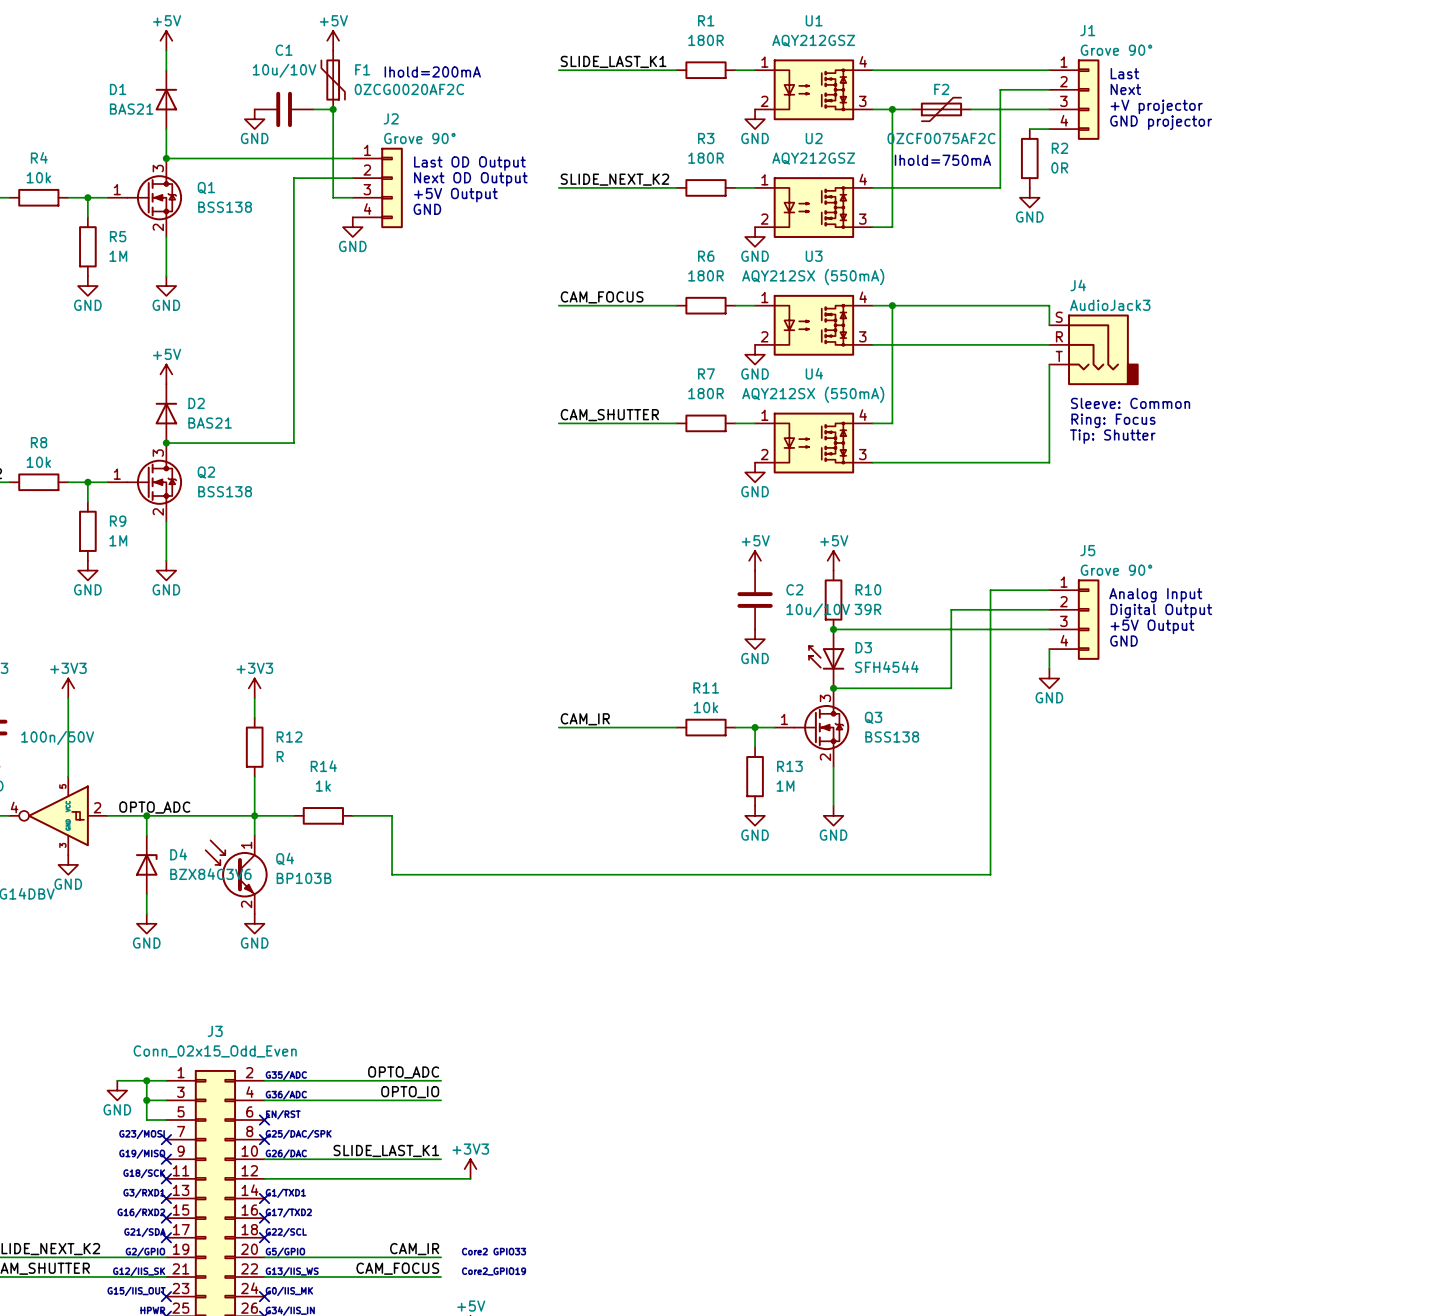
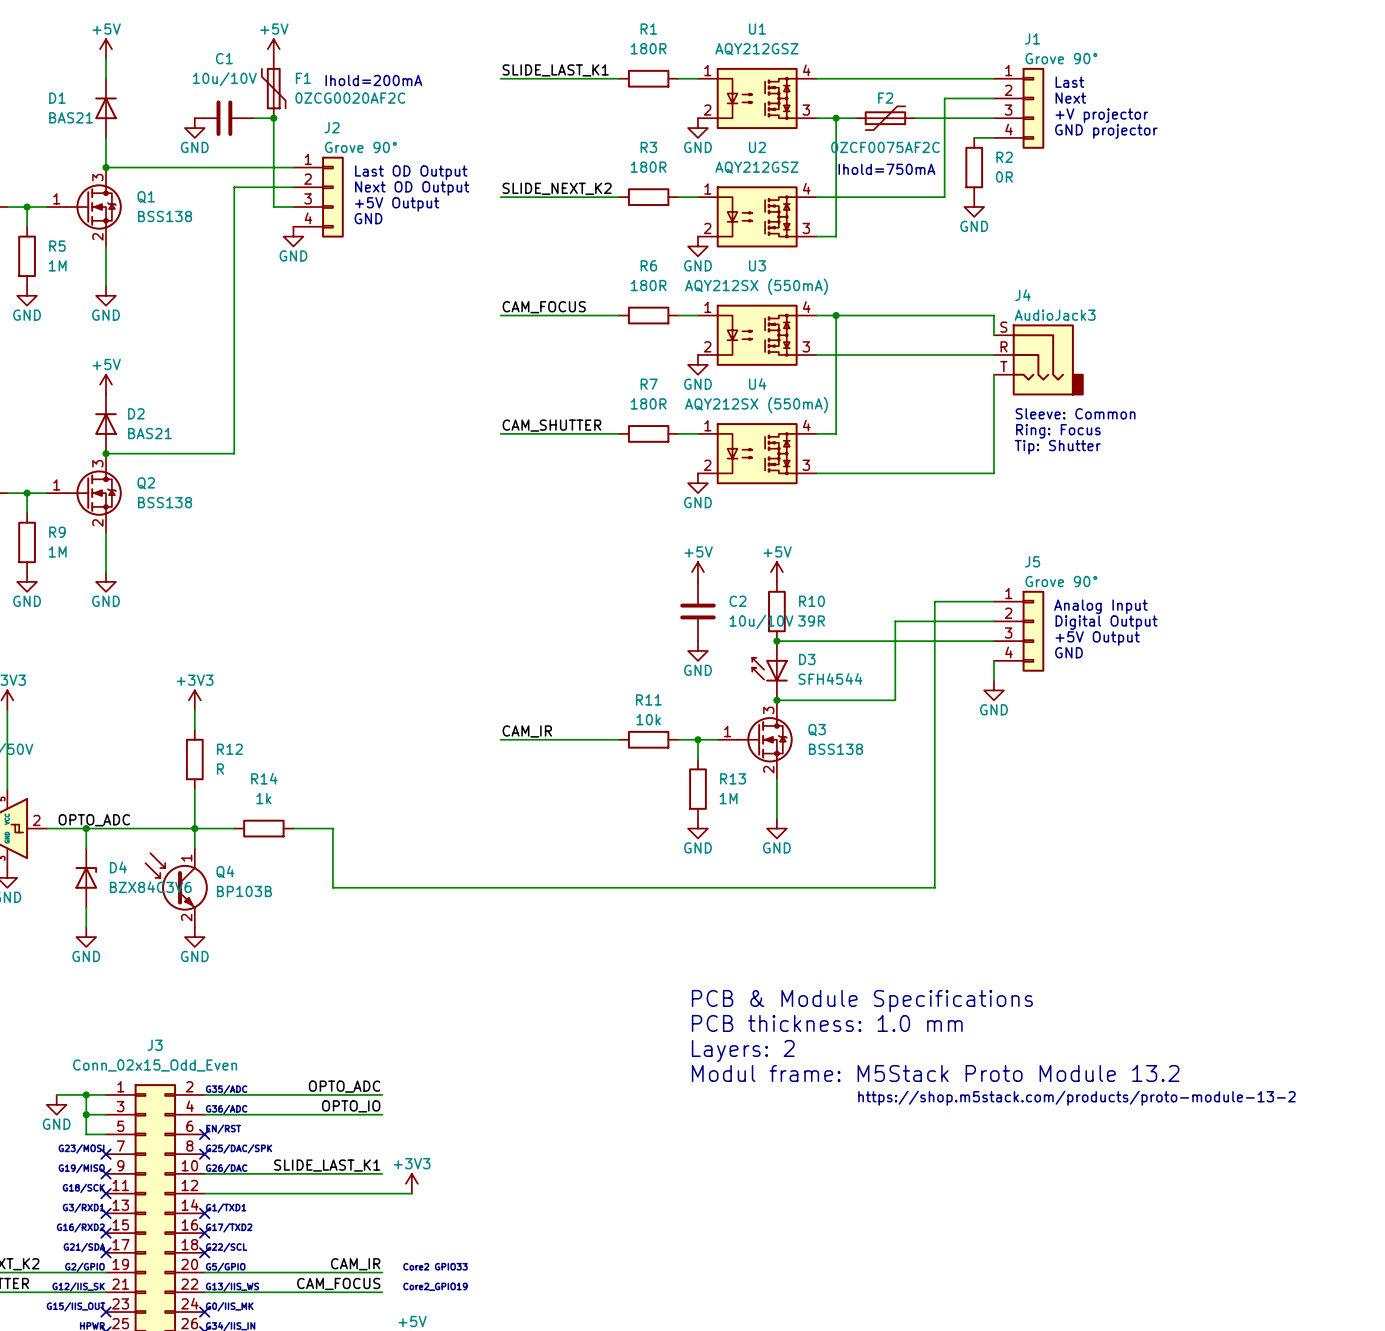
text: none -> PCB & Module Specifications (862, 1001)
text: none -> PCB thickness: 1.0 mm (827, 1023)
text: none -> Layers: 2 (743, 1051)
text: none -> Modul frame: M5Stack Proto Module 13.2 (935, 1073)
text: none -> https://shop.m5stack.com/products/proto-module-13-2 (1076, 1098)

